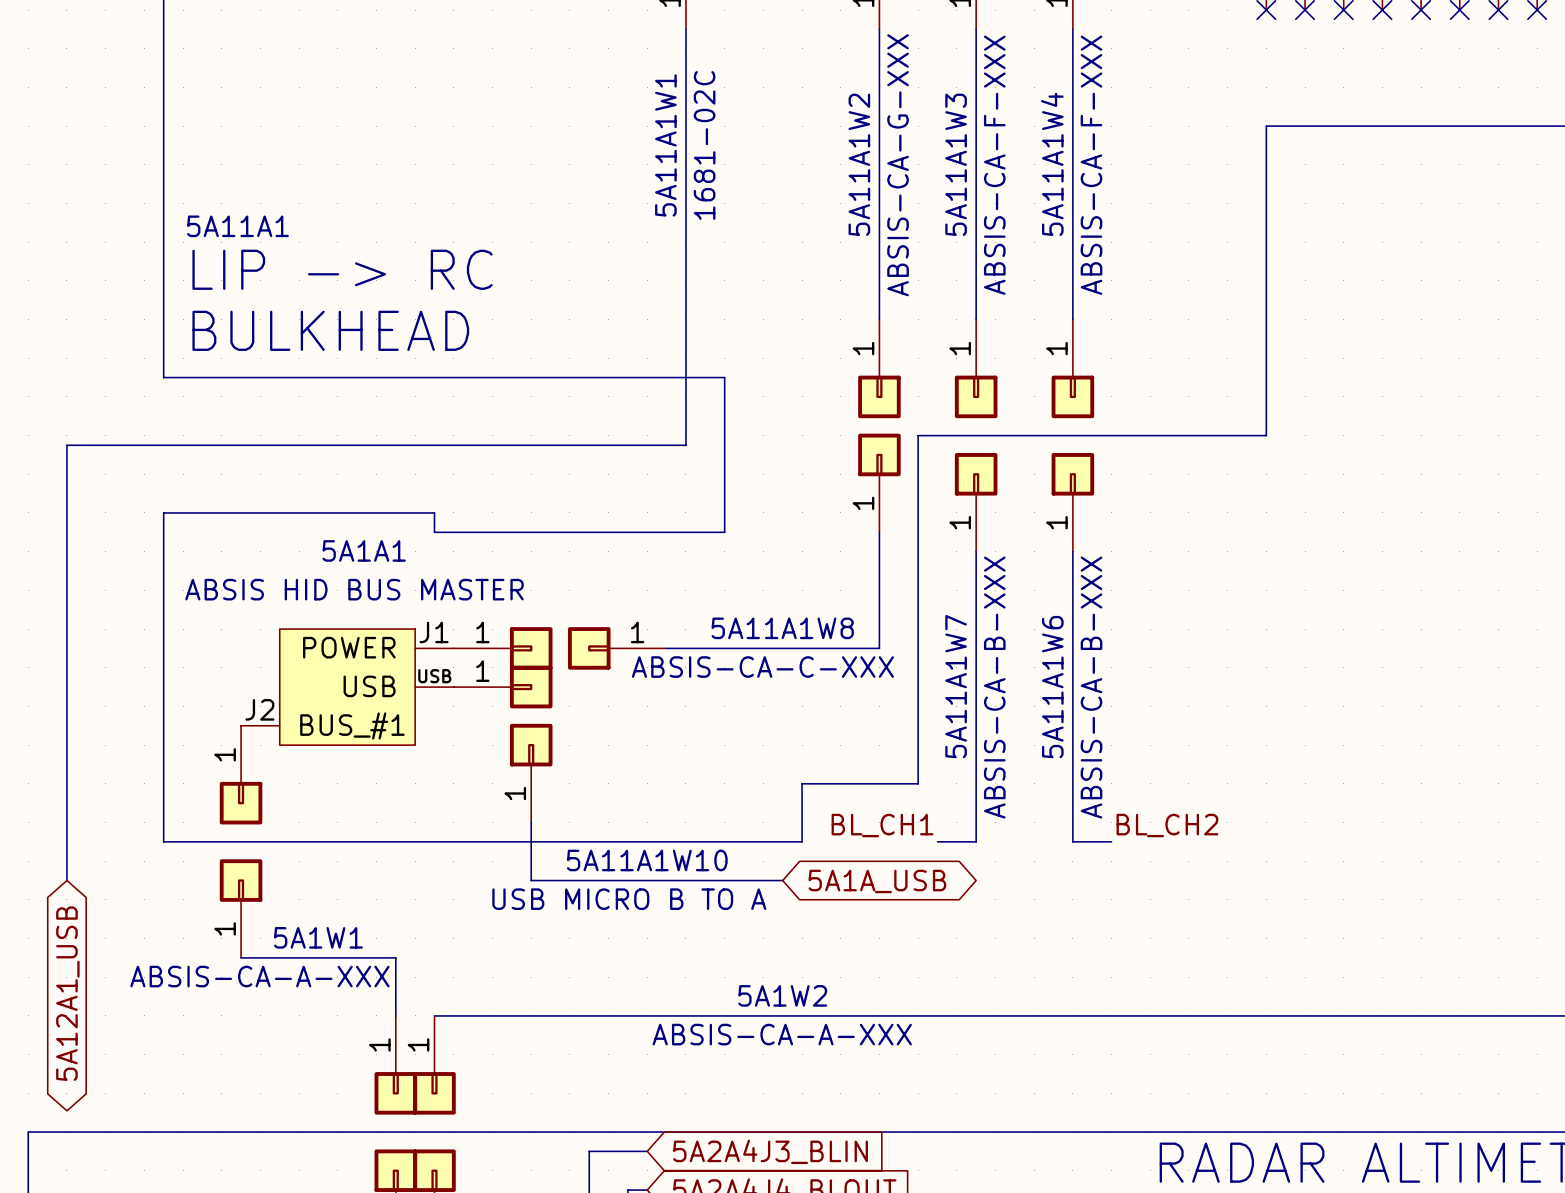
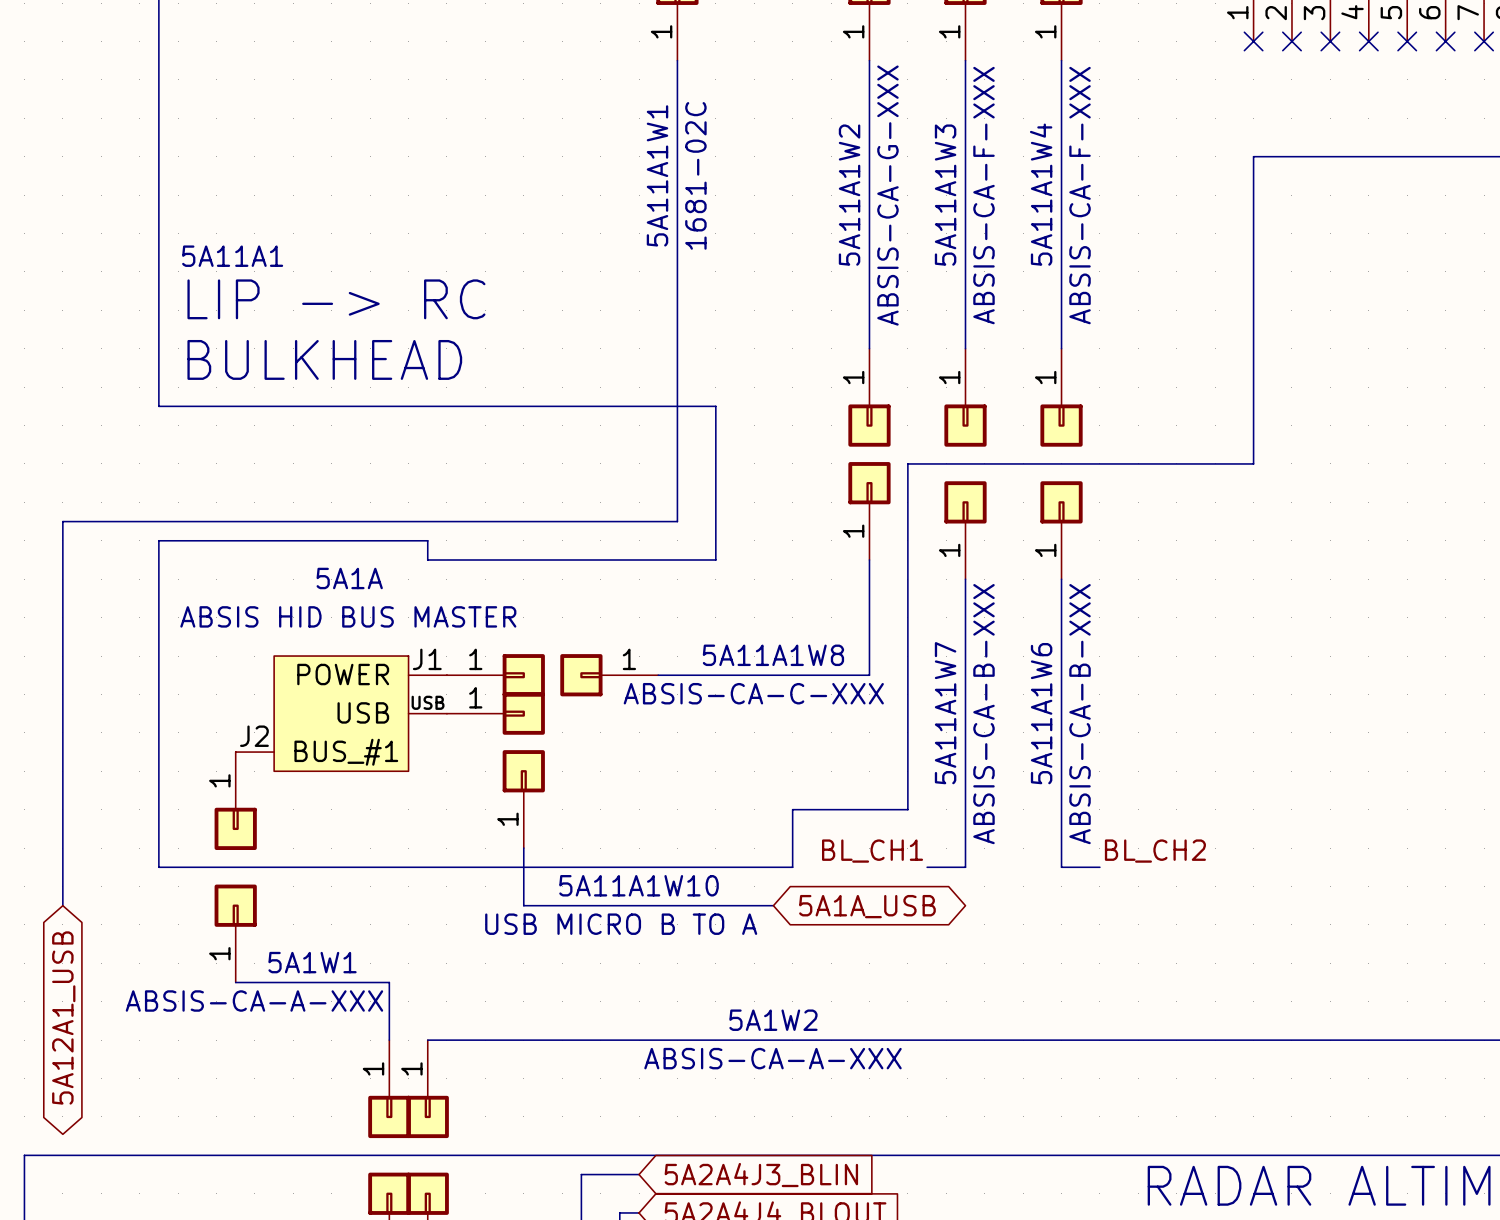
wire: (685, 445) (66, 445) (66, 493) -> (677, 473) (677, 521) (62, 521)
5A1A1 name: 5A1A1 (364, 550) -> 5A1A (349, 578)

